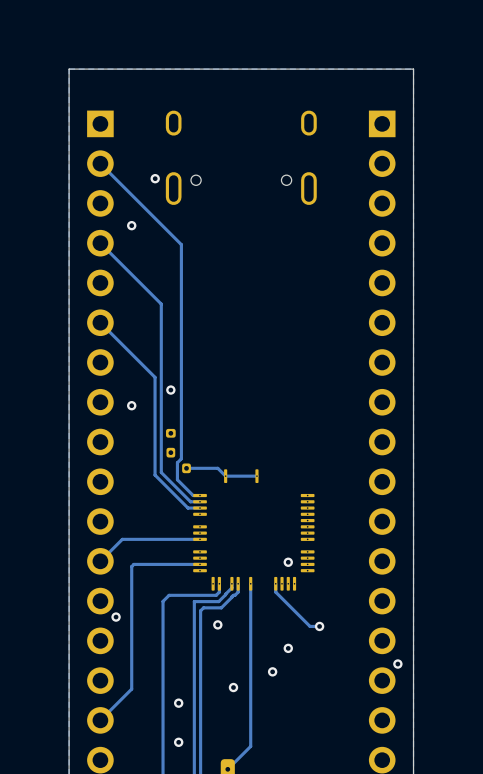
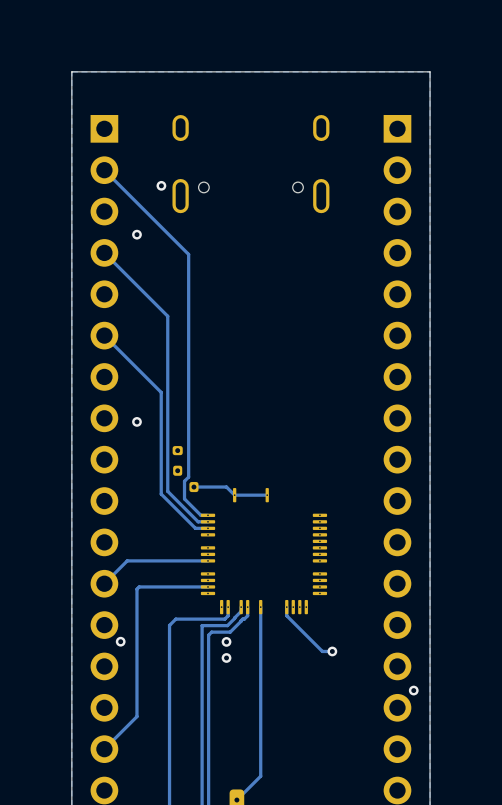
via: (170, 390) -> none
via: (288, 562) -> none
via: none -> (226, 641)
via: (217, 624) -> none
via: none -> (226, 657)
via: (288, 648) -> none
via: (272, 671) -> none
via: (233, 687) -> none
via: (178, 703) -> none
via: (178, 742) -> none

